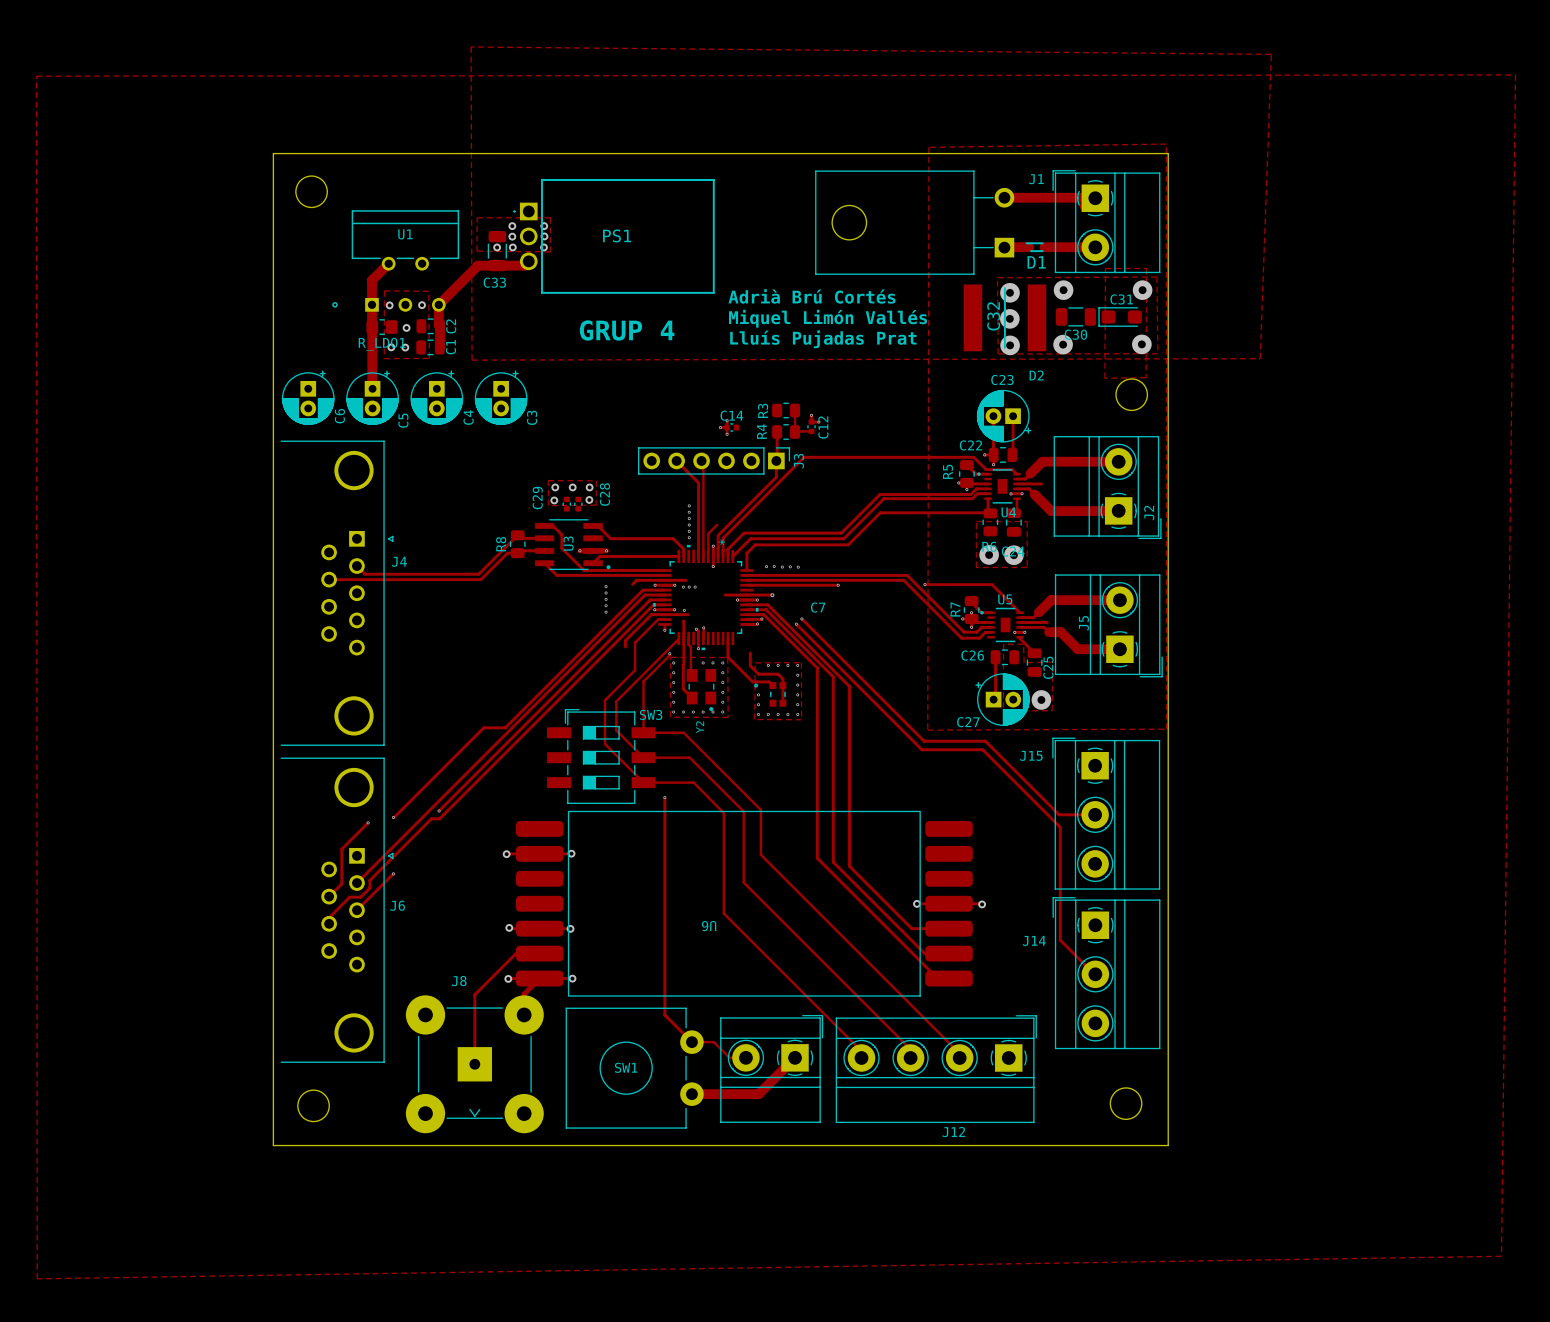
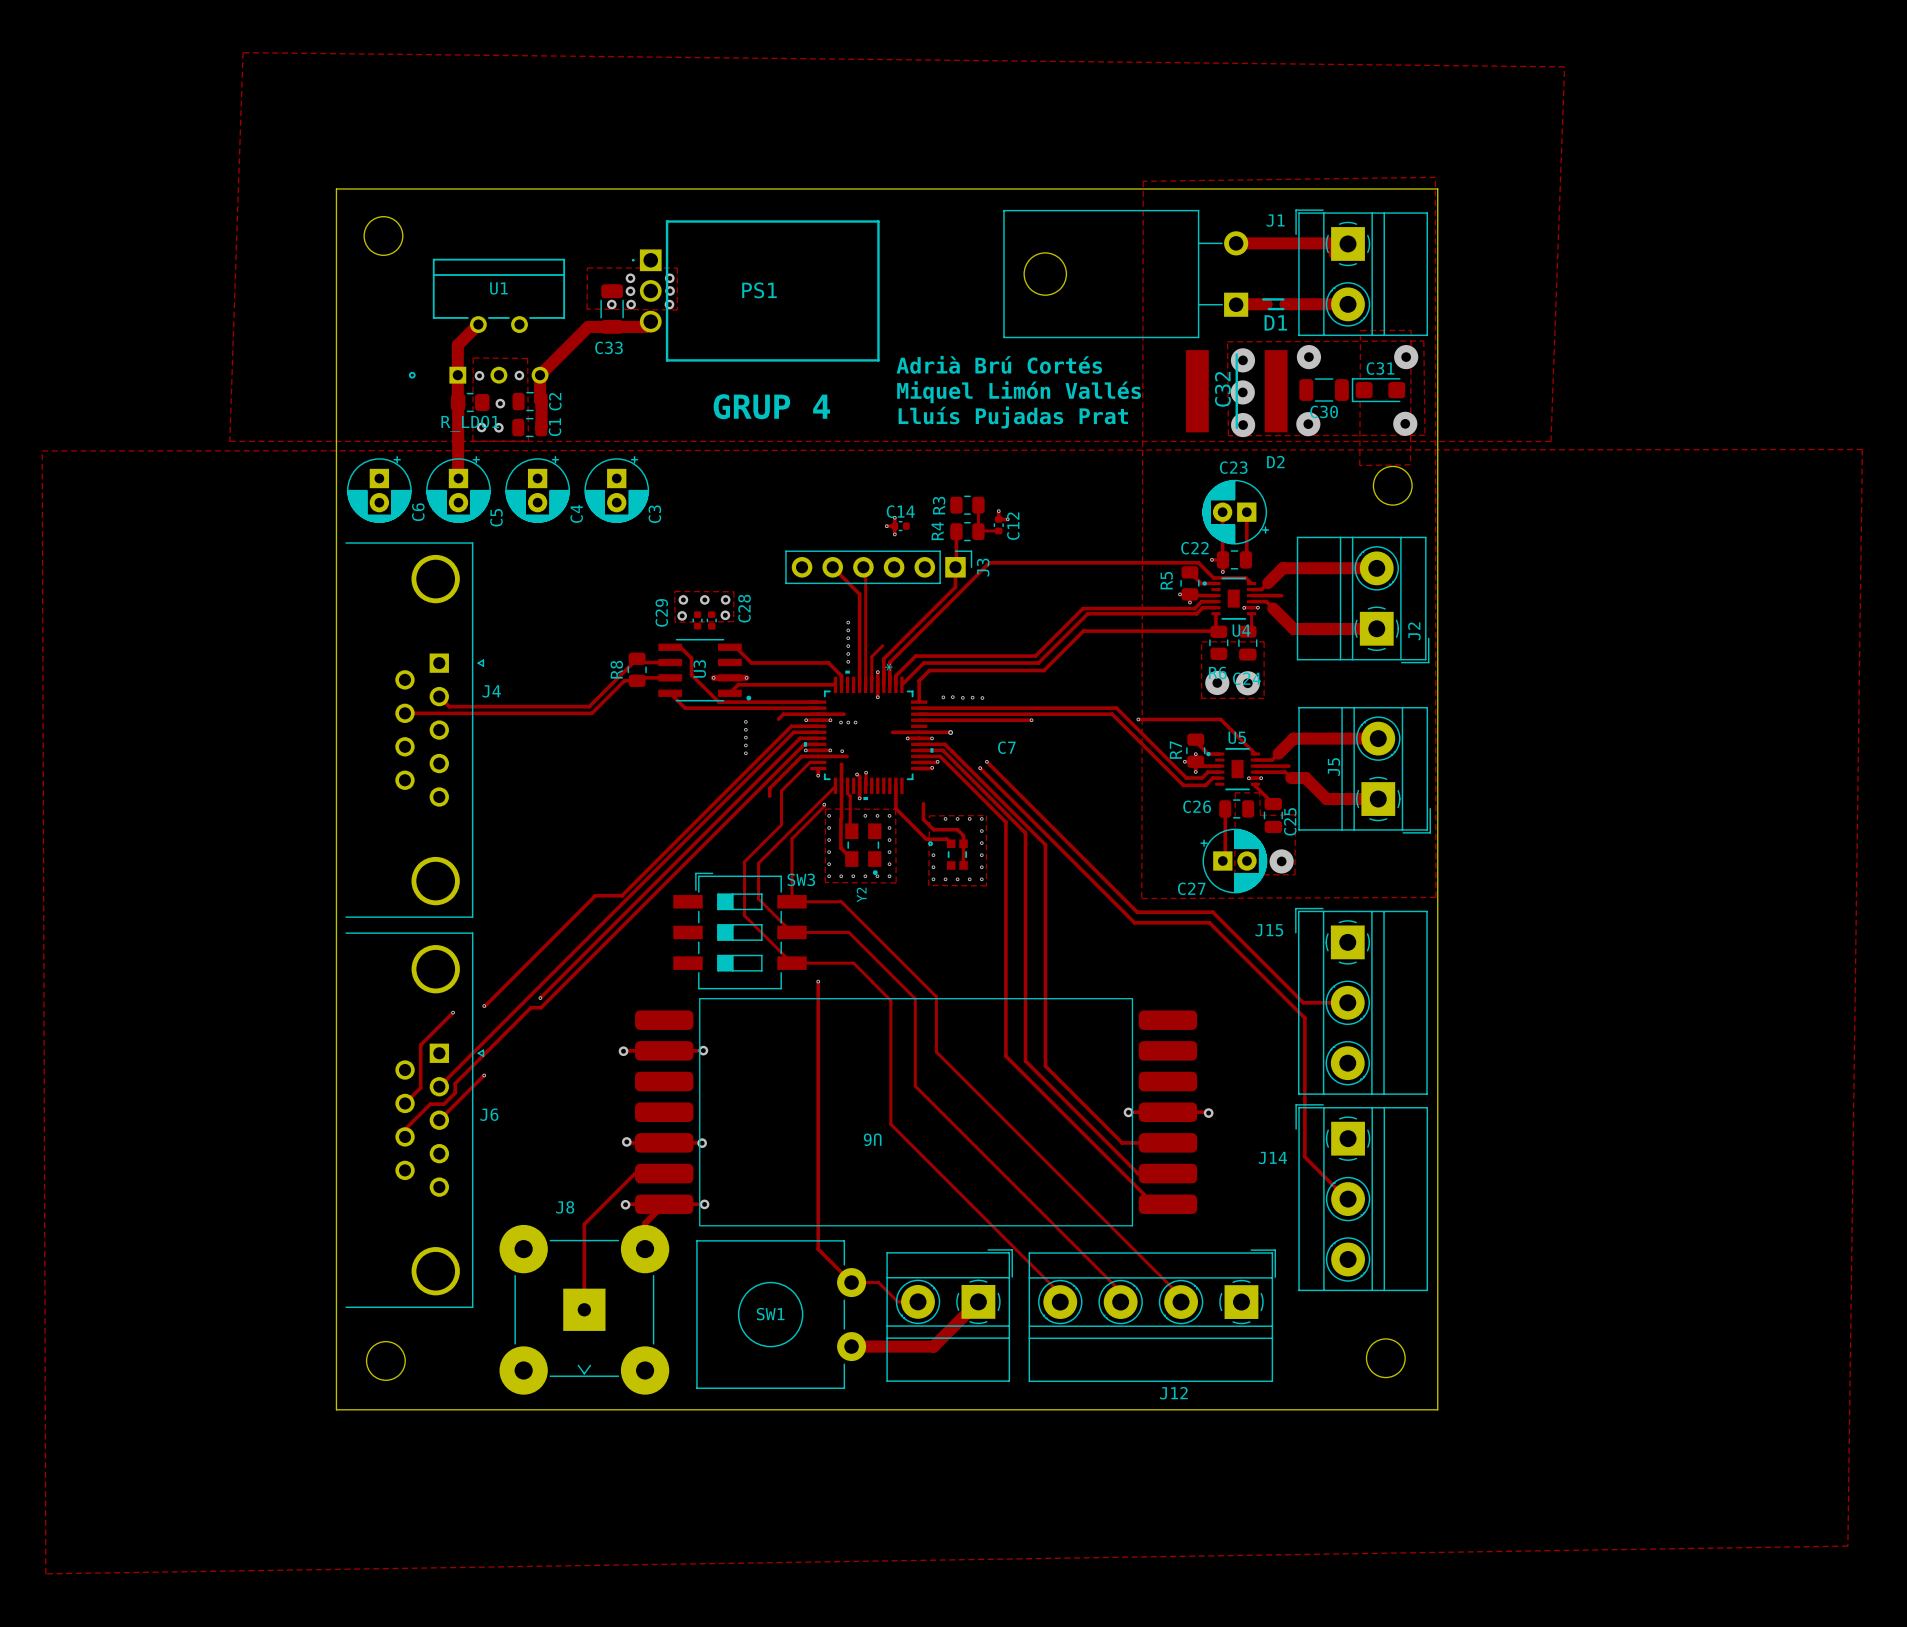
zone outline: (1271, 54) (471, 46) (472, 360) (1260, 358) -> (1564, 66) (243, 52) (229, 441) (1550, 441)
zone outline: (1501, 1256) (1515, 74) (36, 76) (37, 1278) -> (1847, 1546) (1862, 449) (42, 451) (45, 1573)

